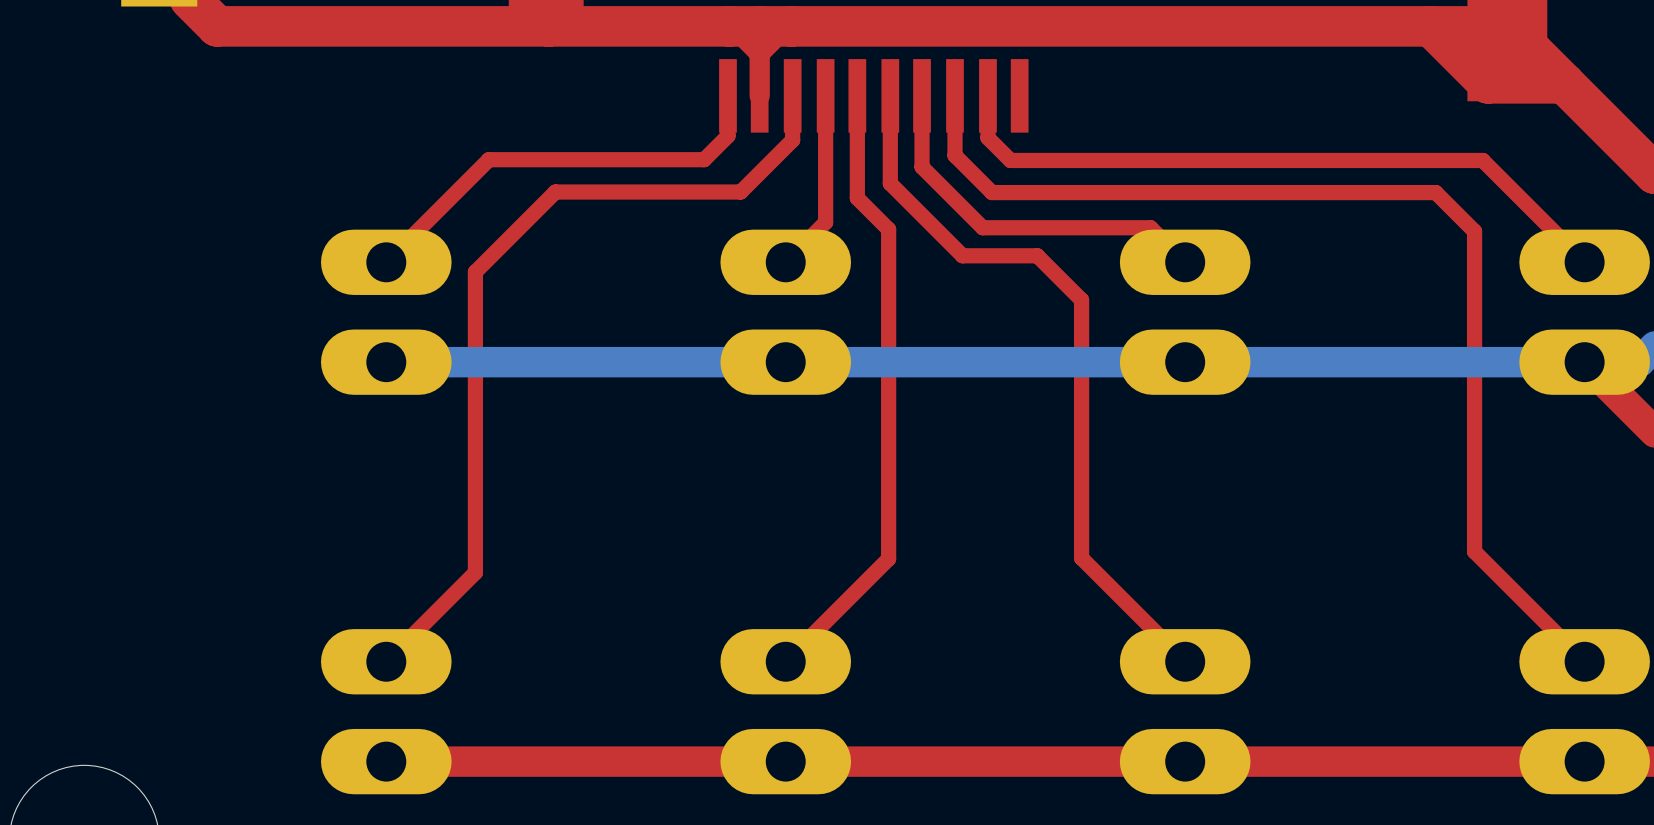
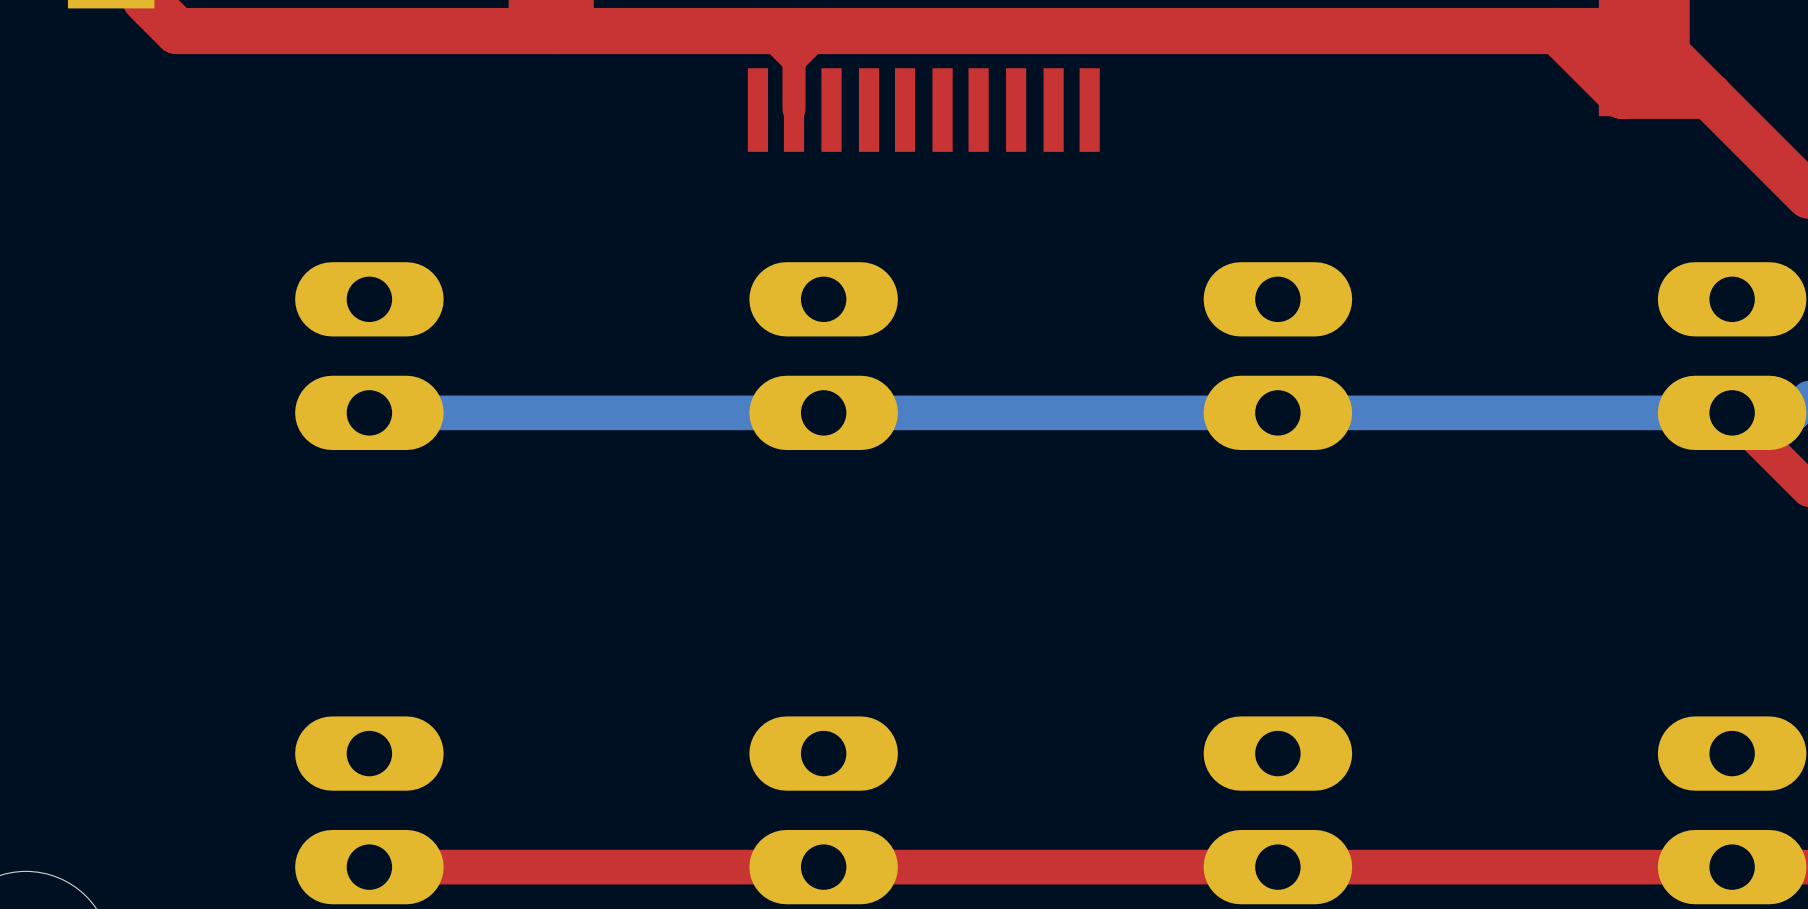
top track: (727, 95) (727, 135) (704, 159) (488, 159) (386, 262) -> none
top track: (792, 95) (792, 140) (740, 192) (555, 192) (475, 272) (475, 572) (386, 661) -> none
top track: (825, 95) (825, 222) (785, 262) -> none
top track: (857, 95) (857, 198) (888, 229) (888, 558) (785, 661) -> none
top track: (890, 95) (890, 183) (962, 255) (1037, 255) (1081, 300) (1081, 558) (1185, 661) -> none
top track: (922, 95) (922, 167) (982, 227) (1150, 227) (1185, 262) -> none
top track: (955, 95) (955, 155) (992, 192) (1435, 192) (1474, 231) (1474, 551) (1584, 661) -> none
top track: (987, 95) (987, 137) (1010, 160) (1482, 160) (1584, 262) -> none

